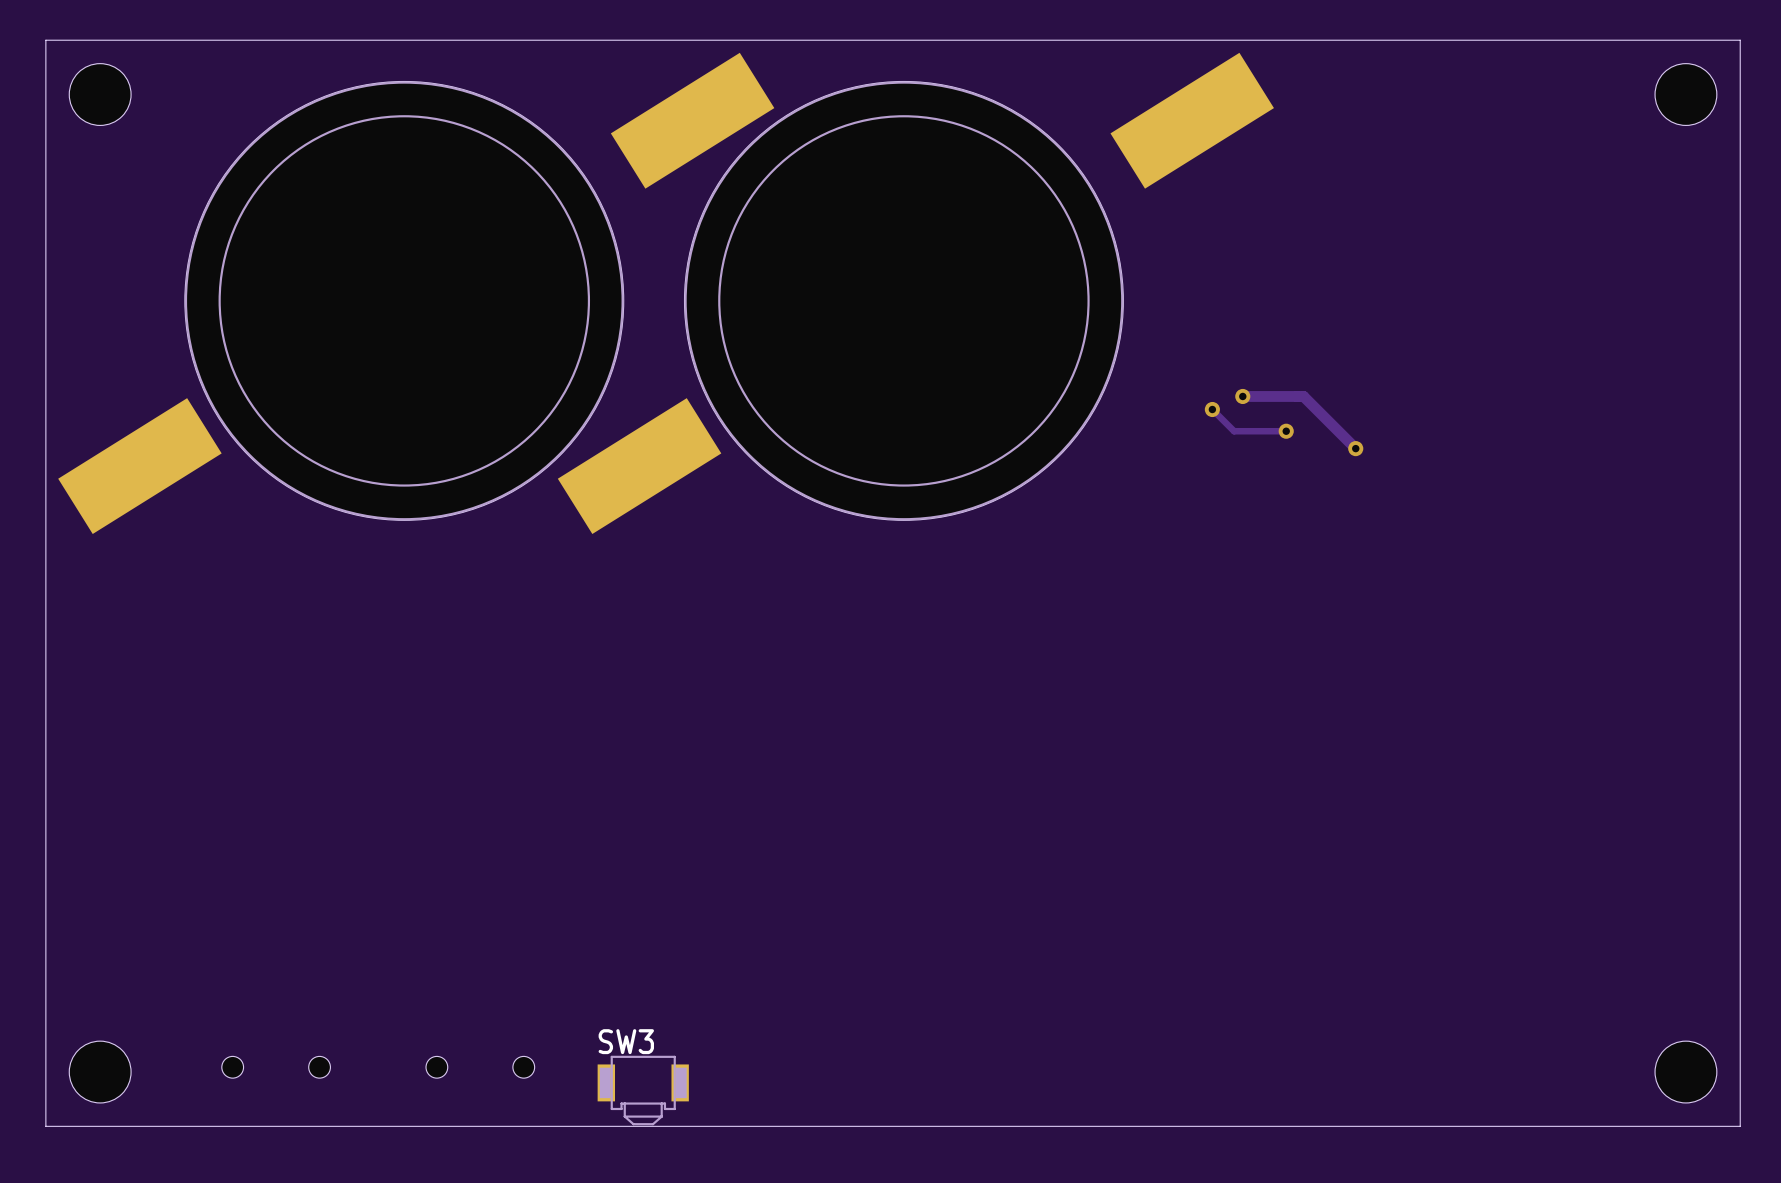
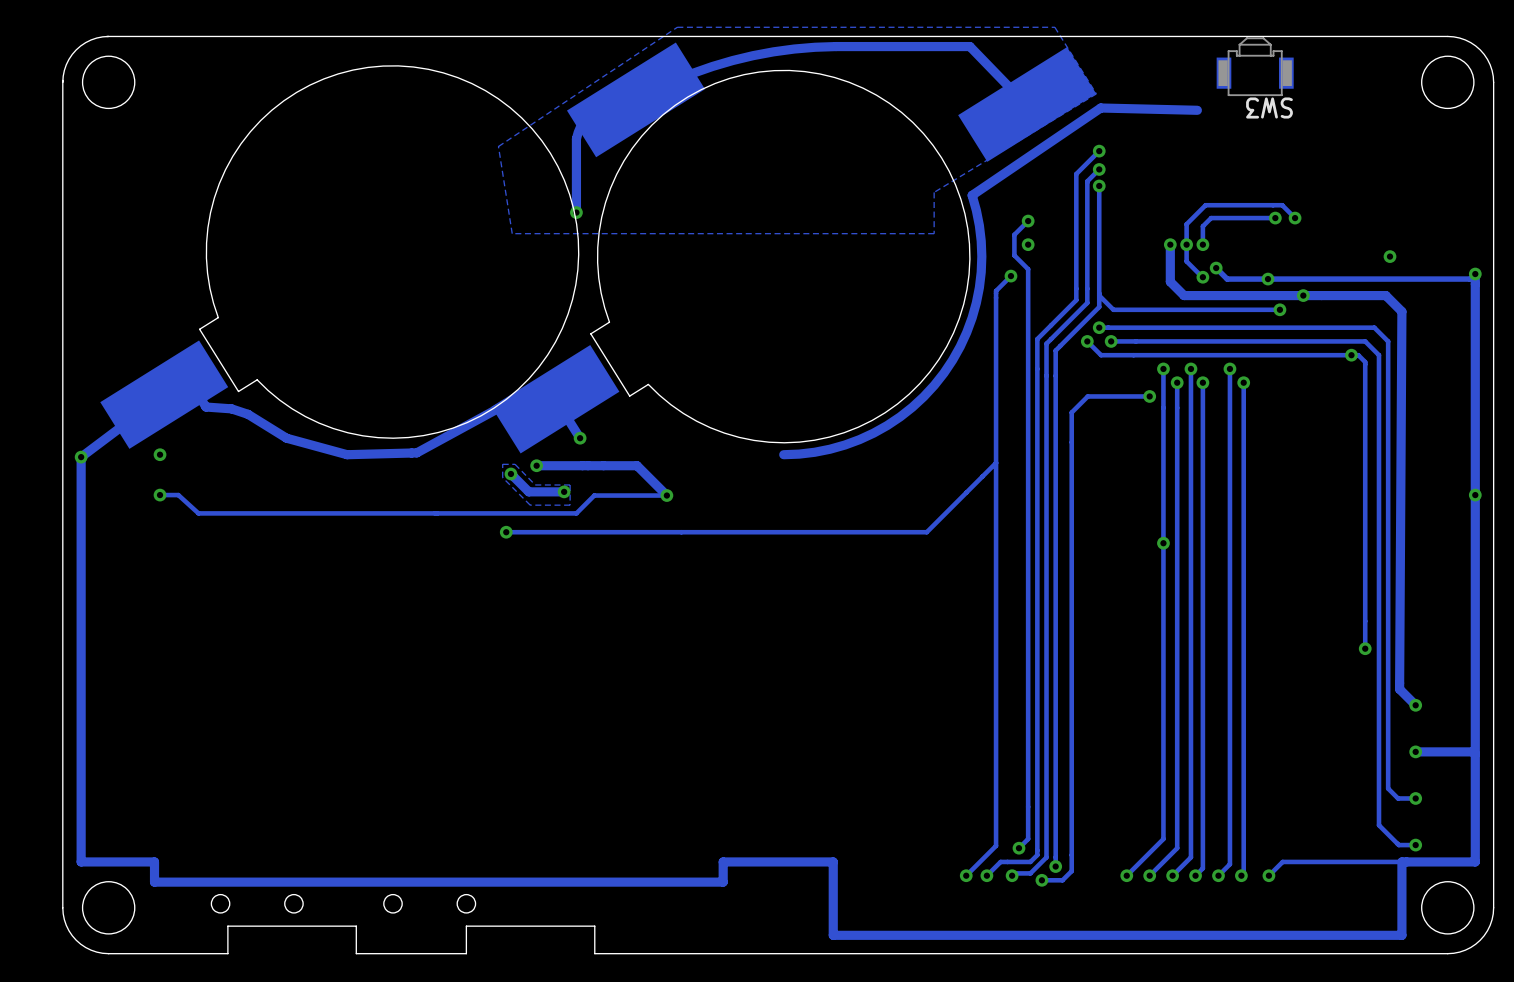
zone outline: none -> (1054, 27) (677, 27) (498, 146) (512, 233) (934, 233) (934, 192) (1096, 93) (1054, 27)
board edge: (98, 40) (45, 40) (45, 92) -> none
board edge: none -> (108, 36) (91, 39) (76, 49) (66, 64) (62, 82)
board edge: (1685, 40) (1740, 40) (1740, 94) -> (1447, 36) (1465, 39) (1480, 49) (1490, 64) (1493, 82)
part footprint: [557, 52, 1274, 535] -> [491, 47, 1097, 454]
track: none -> (1027, 104) (969, 46) (815, 47) (773, 51) (732, 60) (673, 81) (636, 99) (616, 99) (603, 103) (592, 110) (580, 126) (576, 138) (576, 212)
track: none -> (1197, 110) (1100, 108) (972, 195) (981, 241) (979, 287) (966, 332) (944, 373) (912, 407) (873, 433) (829, 449) (783, 454)
track: none -> (1099, 151) (1076, 174) (1076, 300) (1037, 339) (1037, 855) (1030, 861) (1000, 861) (986, 875)
via: none -> (1099, 151)
track: none -> (1099, 169) (1087, 181) (1087, 302) (1046, 343) (1046, 857) (1030, 873) (1014, 873) (1012, 875)
via: none -> (1099, 169)
track: none -> (1099, 185) (1099, 307) (1055, 350) (1055, 866)
via: none -> (1099, 185)
via: none -> (576, 212)
track: none -> (1275, 218) (1211, 218) (1202, 226) (1202, 244)
via: none -> (1275, 218)
track: none -> (1295, 218) (1282, 205) (1205, 205) (1186, 224) (1186, 261) (1202, 277)
via: none -> (1295, 218)
track: none -> (1028, 221) (1014, 234) (1014, 255) (1028, 269) (1028, 839) (1018, 848)
via: none -> (1028, 221)
via: none -> (1028, 244)
track: none -> (1170, 244) (1170, 281) (1184, 295) (1385, 295) (1401, 311) (1399, 689) (1415, 705)
via: none -> (1170, 244)
via: none -> (1186, 244)
via: none -> (1202, 244)
part: none -> (402, 245)
part: (416, 293) -> none
via: none -> (1390, 256)
track: none -> (1216, 268) (1227, 279) (1470, 279) (1475, 284)
via: none -> (1216, 268)
via: none -> (1475, 274)
track: none -> (1475, 274) (1475, 861) (1401, 861) (1401, 935) (833, 935) (833, 861) (723, 861) (723, 882) (154, 882) (154, 861) (81, 861) (81, 457) (164, 394) (194, 388) (205, 407) (231, 408) (248, 414) (286, 438) (347, 454) (416, 452) (497, 408) (555, 399) (580, 438)
track: none -> (1010, 276) (996, 290) (996, 462)
via: none -> (1010, 276)
via: none -> (1202, 277)
via: none -> (1268, 279)
track: none -> (1099, 295) (1113, 309) (1279, 309)
via: none -> (1303, 295)
via: none -> (1279, 309)
track: none -> (1099, 327) (1374, 327) (1388, 341) (1388, 788) (1398, 798) (1415, 798)
via: none -> (1099, 327)
track: (1242, 396) (1303, 396) (1355, 448) -> none
via: (1242, 396) -> none
track: none -> (1087, 341) (1101, 355) (1358, 355) (1365, 362) (1365, 648)
via: none -> (1087, 341)
track: none -> (1111, 341) (1365, 341) (1378, 355) (1378, 825) (1398, 845) (1415, 845)
via: none -> (1111, 341)
track: (1212, 409) (1234, 431) (1286, 431) -> none
via: (1212, 409) -> none
via: none -> (1351, 355)
via: (1286, 431) -> none
track: none -> (1163, 368) (1163, 839) (1126, 875)
via: none -> (1163, 368)
track: none -> (1190, 368) (1190, 857) (1172, 875)
via: none -> (1190, 368)
track: none -> (1229, 368) (1229, 864) (1218, 875)
via: none -> (1229, 368)
via: (1355, 448) -> none
track: none -> (1177, 382) (1177, 848) (1149, 875)
via: none -> (1177, 382)
track: none -> (1202, 382) (1202, 868) (1195, 875)
via: none -> (1202, 382)
track: none -> (1243, 382) (1243, 873) (1241, 875)
via: none -> (1243, 382)
track: none -> (1149, 396) (1087, 396) (1071, 412) (1071, 871) (1062, 880) (1041, 880)
via: none -> (1149, 396)
via: none -> (580, 438)
via: none -> (160, 454)
via: none -> (81, 457)
track: none -> (996, 462) (926, 532) (506, 532)
track: none -> (996, 462) (996, 845) (966, 875)
zone outline: none -> (515, 464) (502, 464) (502, 477) (530, 505) (570, 505) (570, 484) (535, 484) (515, 464)
track: none -> (536, 465) (637, 465) (666, 495) (594, 495) (576, 513) (198, 513) (178, 495) (160, 495)
via: none -> (536, 465)
track: none -> (510, 473) (528, 491) (564, 491)
via: none -> (510, 473)
via: none -> (564, 491)
via: none -> (160, 495)
via: none -> (666, 495)
via: none -> (1475, 495)
via: none -> (506, 532)
via: none -> (1163, 543)
via: none -> (1365, 648)
via: none -> (1415, 705)
track: none -> (1415, 751) (1473, 751) (1475, 754)
via: none -> (1415, 751)
via: none -> (1415, 798)
via: none -> (1415, 845)
via: none -> (1018, 848)
track: none -> (1406, 861) (1282, 861) (1268, 875)
via: none -> (1055, 866)
via: none -> (966, 875)
via: none -> (986, 875)
via: none -> (1012, 875)
via: none -> (1126, 875)
via: none -> (1149, 875)
via: none -> (1172, 875)
via: none -> (1195, 875)
via: none -> (1218, 875)
via: none -> (1241, 875)
via: none -> (1268, 875)
via: none -> (1041, 880)
board edge: (45, 1072) (45, 1126) (100, 1126) -> (62, 907) (66, 925) (76, 940) (91, 950) (108, 953)
board edge: (1740, 1072) (1740, 1126) (1685, 1126) -> (1493, 907) (1490, 925) (1480, 940) (1465, 950) (1447, 953)
SW3 rotation: 0° (643, 1090) -> 180° (1255, 66)
SW3 position: (643, 1090) -> (1255, 66)
board edge: (393, 1126) (241, 1126) -> (356, 953) (356, 926) (227, 926) (227, 953)
board edge: (675, 1126) (523, 1126) -> (594, 953) (594, 926) (466, 926) (466, 953)

